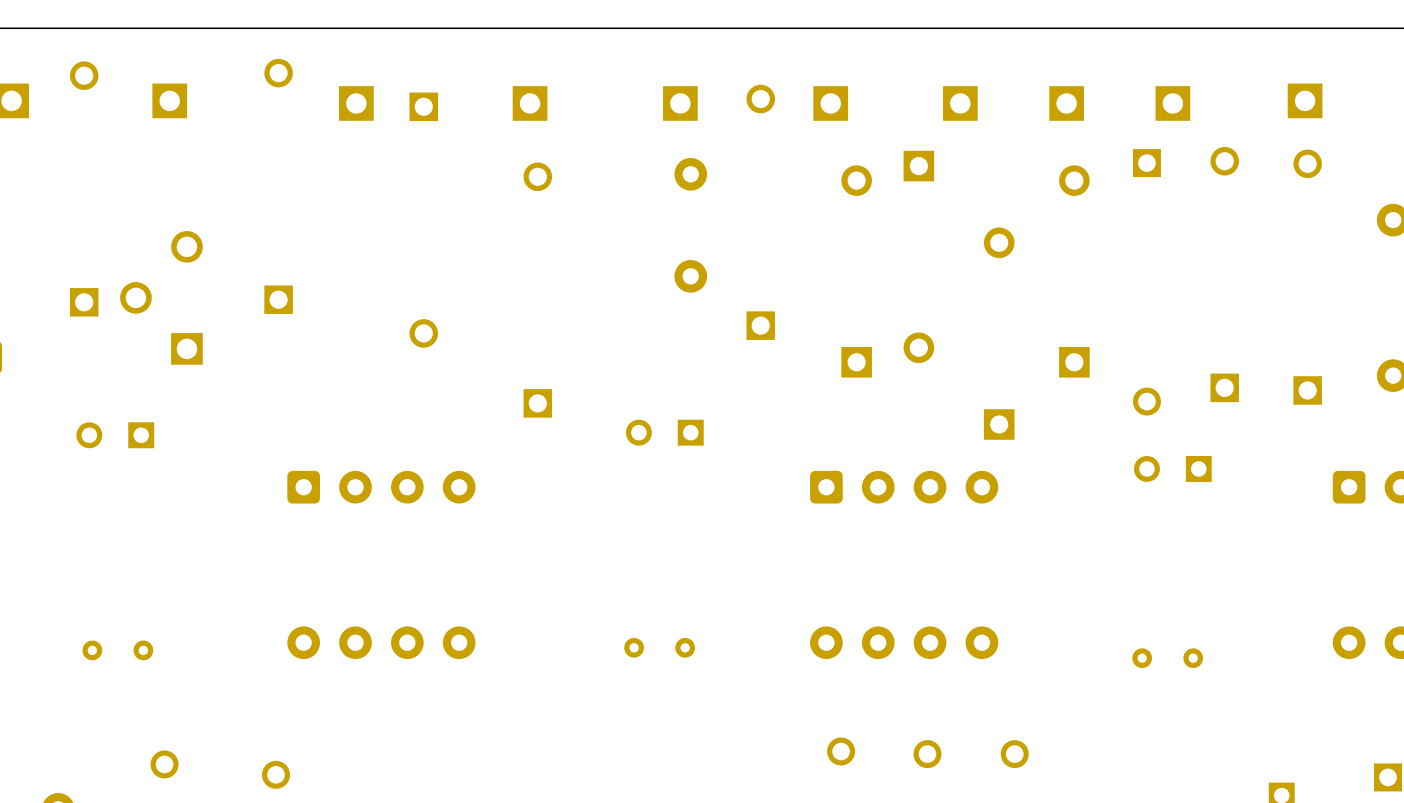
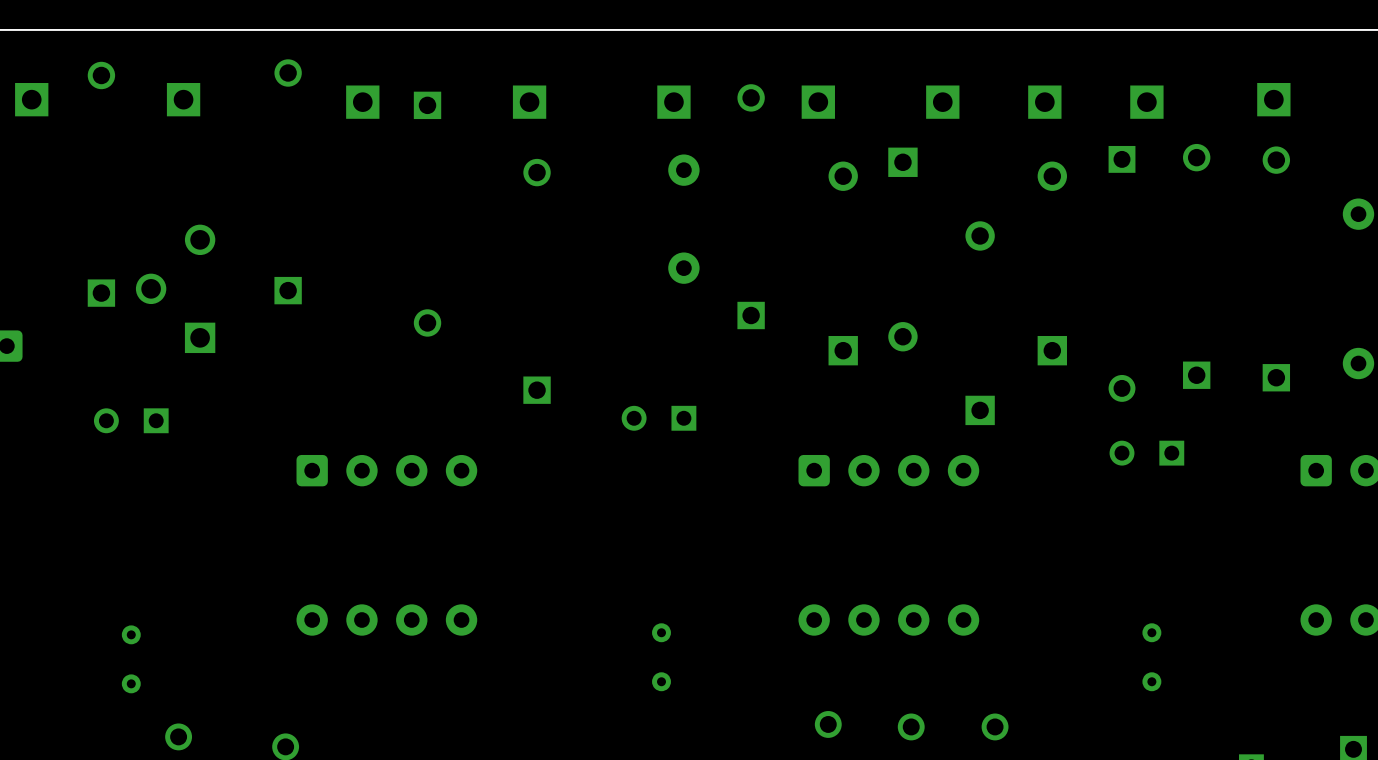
part rotation: 0° (659, 647) -> 90° clockwise (661, 657)
part rotation: 0° (117, 650) -> 90° clockwise (131, 659)
part rotation: 0° (1167, 658) -> 90° clockwise (1151, 657)

